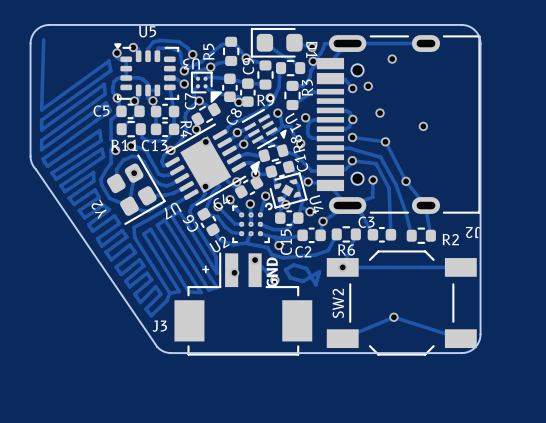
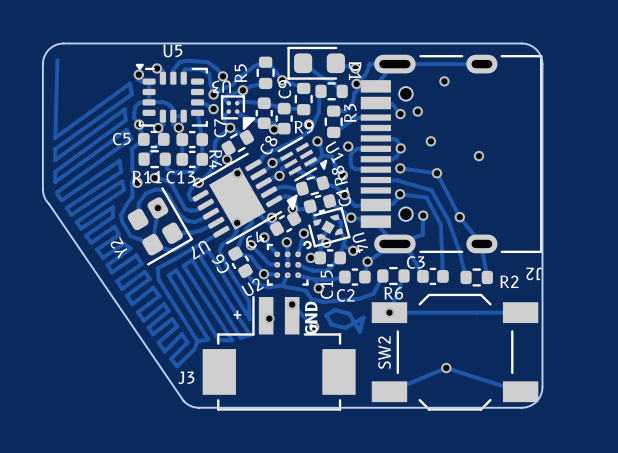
via: none -> (344, 194)
via: none -> (310, 257)
via: none -> (263, 274)

